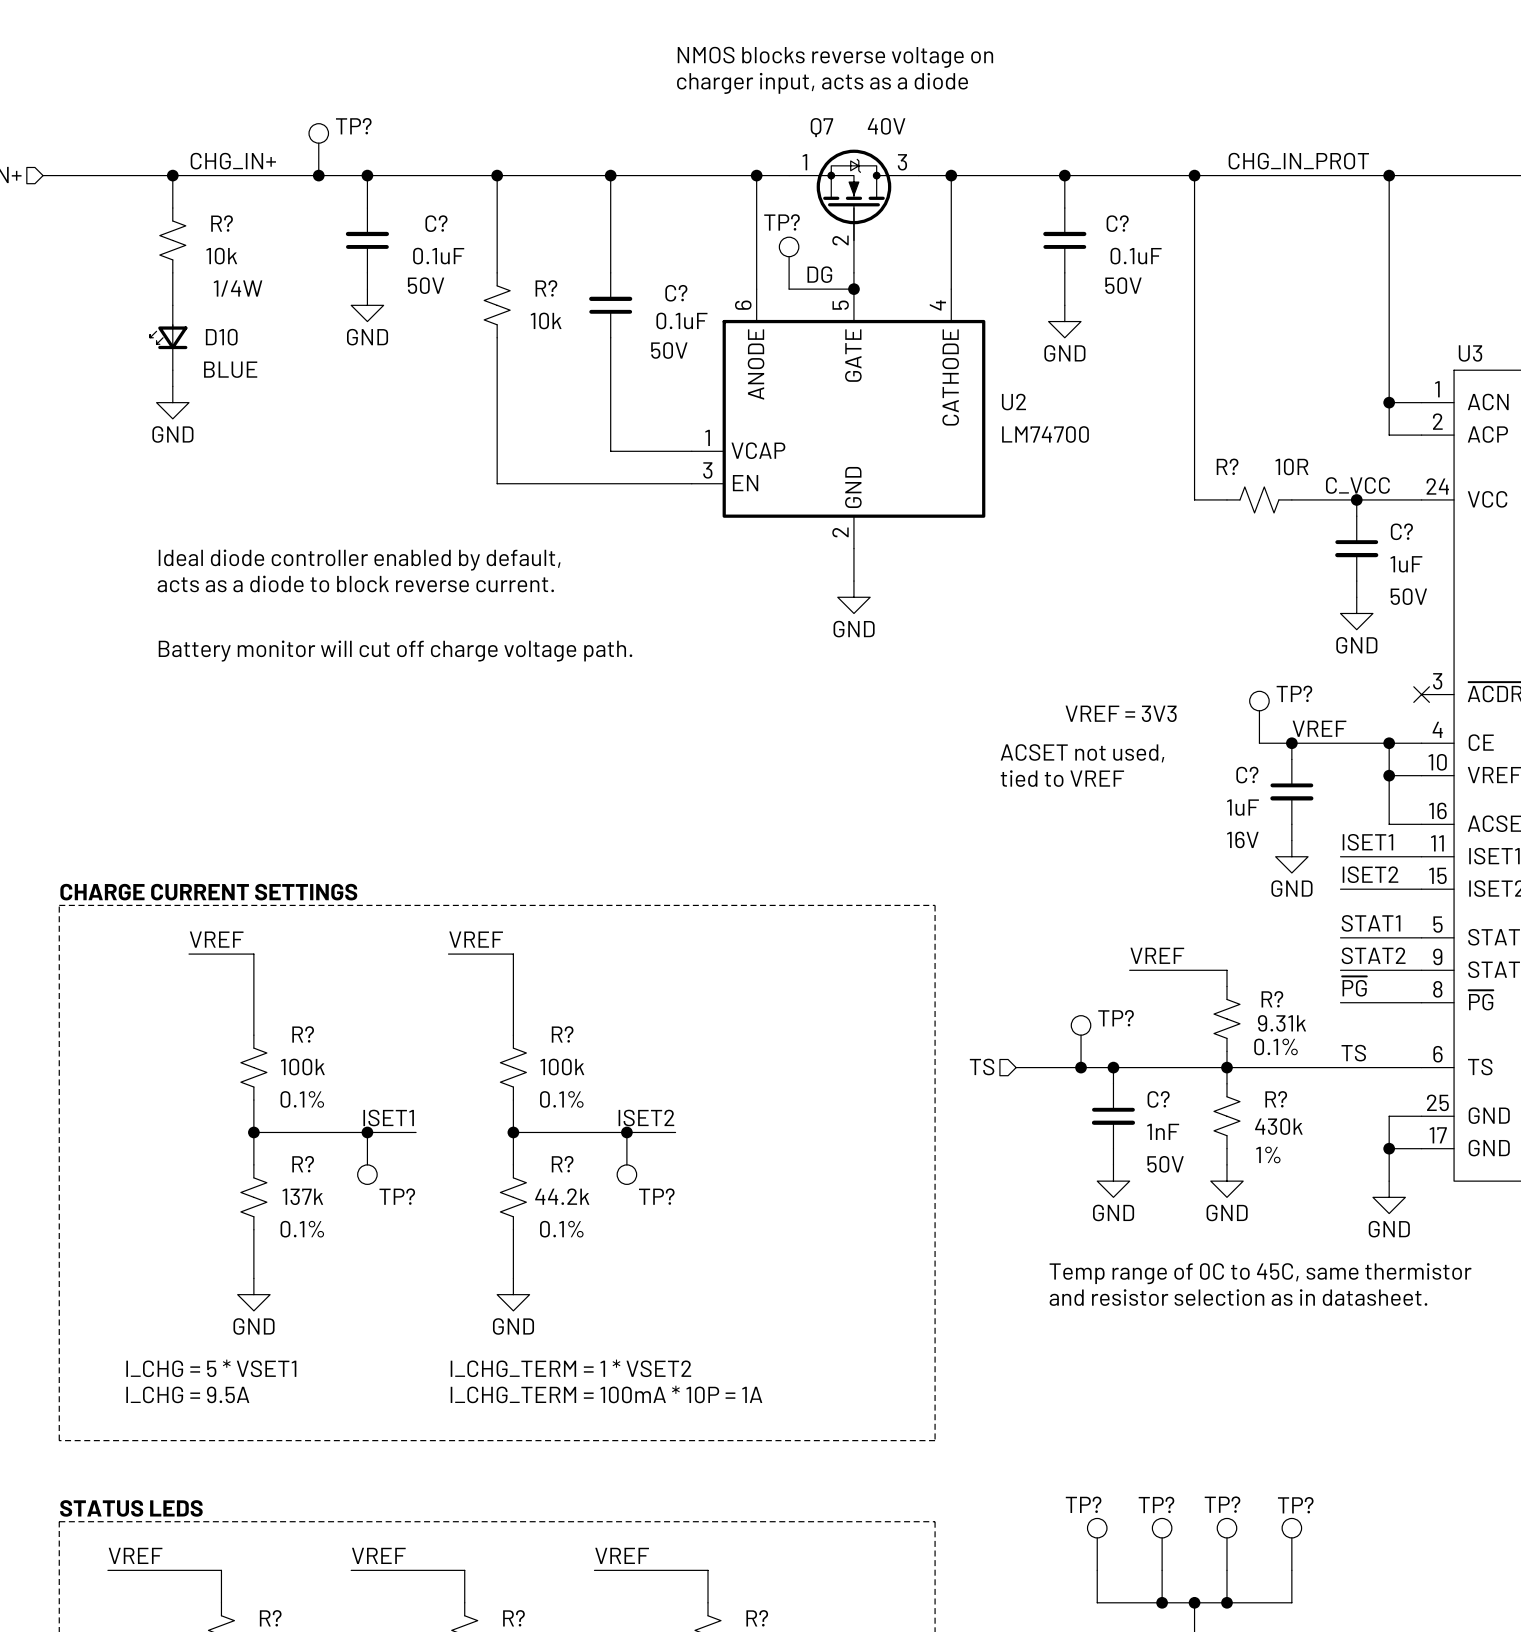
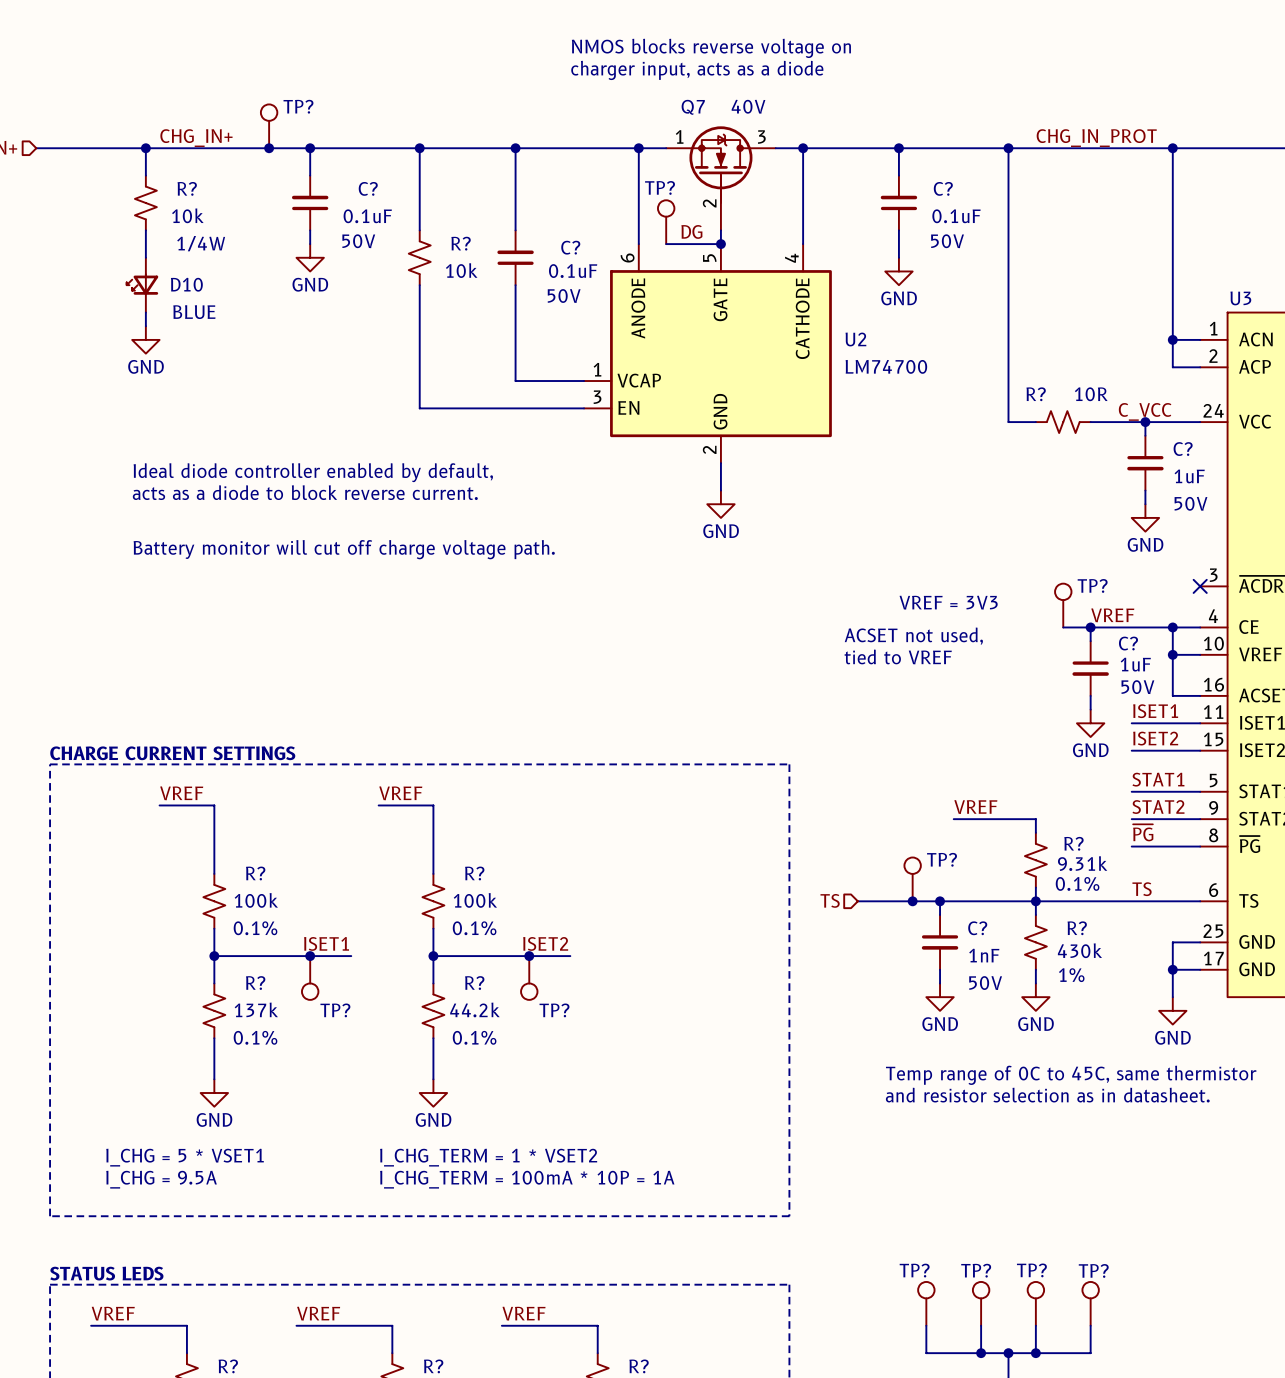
C? name position: C? (1247, 775) -> C? (1128, 643)
C? value position: 1uF (1243, 807) -> 1uF (1135, 664)
C? text: 16V (1242, 839) -> 50V (1137, 687)

